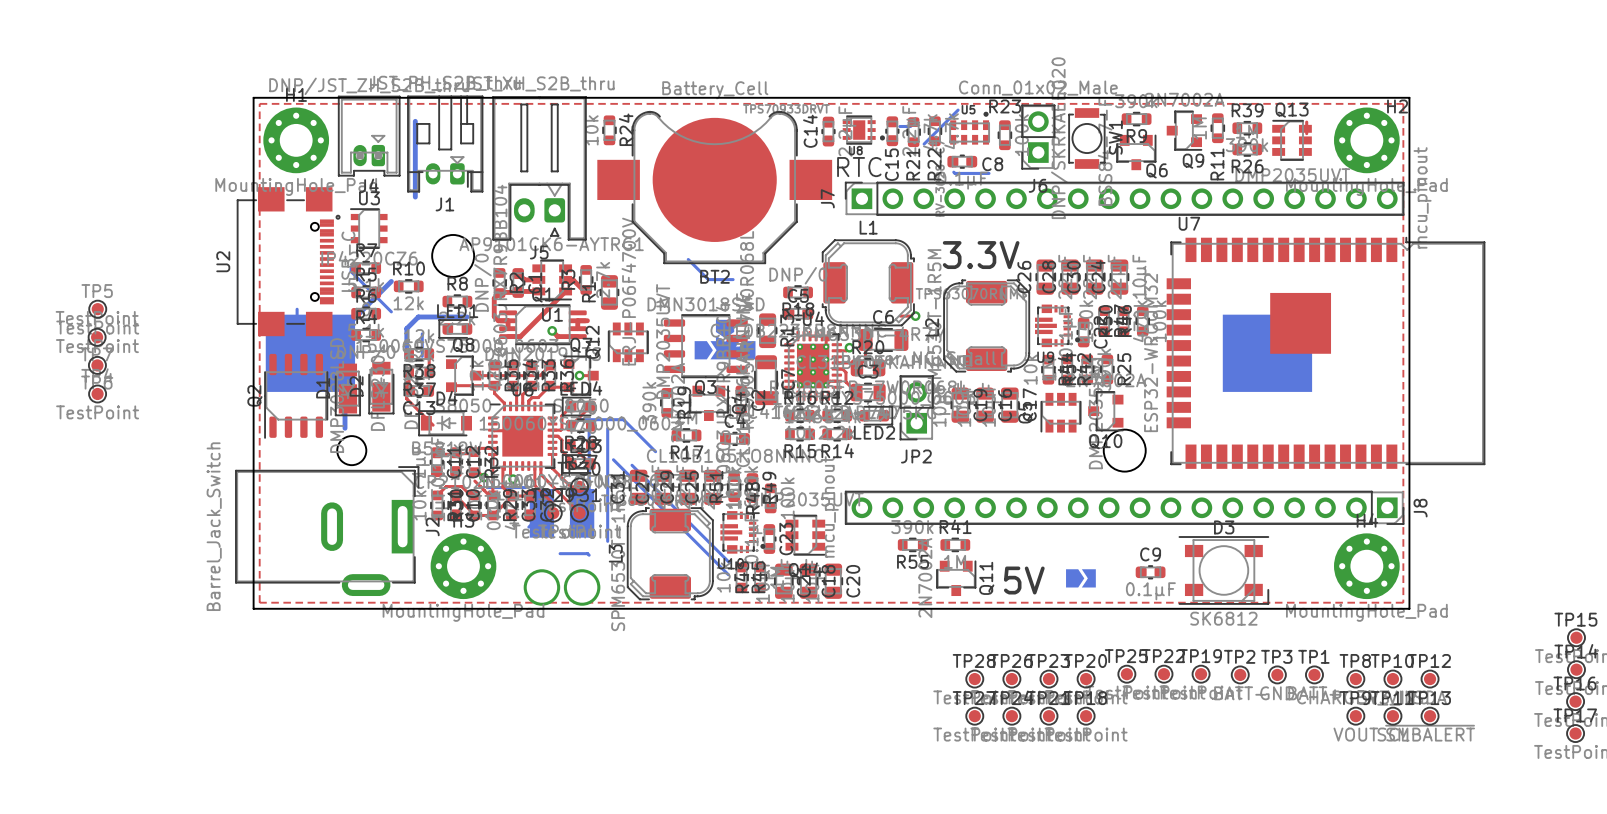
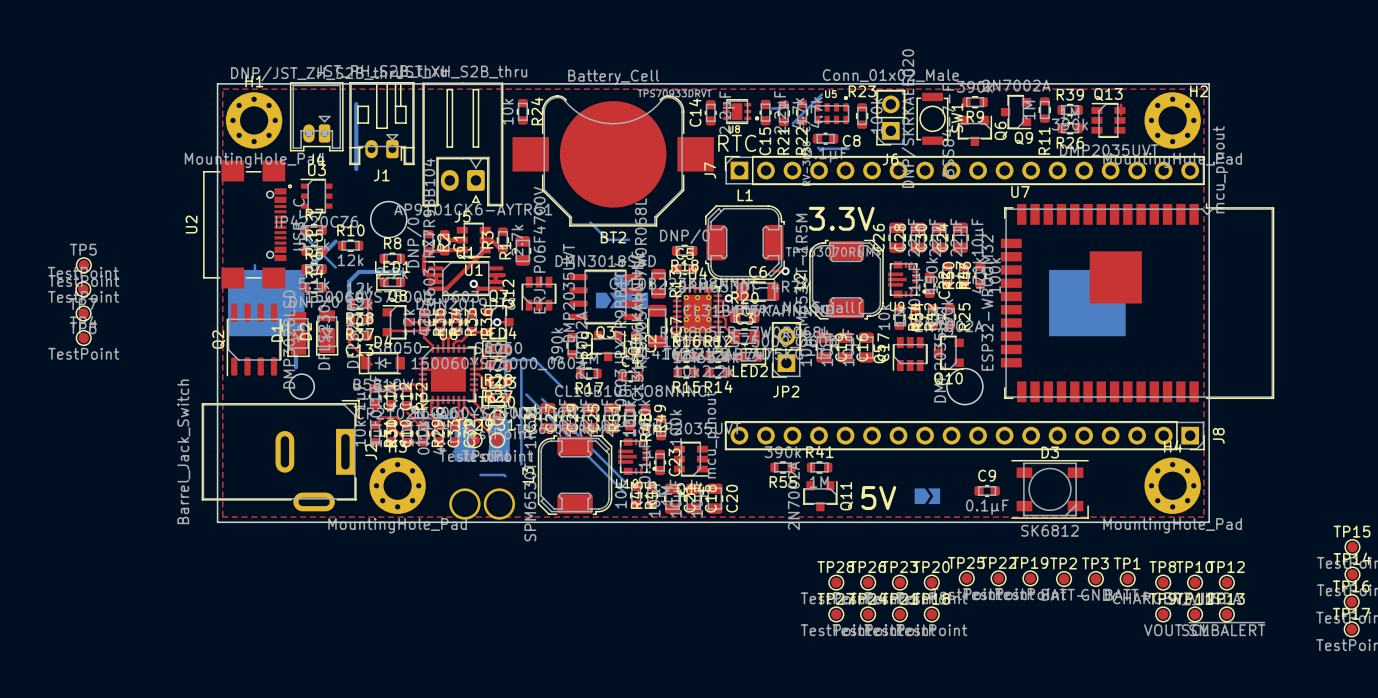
Q6 name rotation: 0° (1156, 170) -> 90° counterclockwise (1001, 130)

